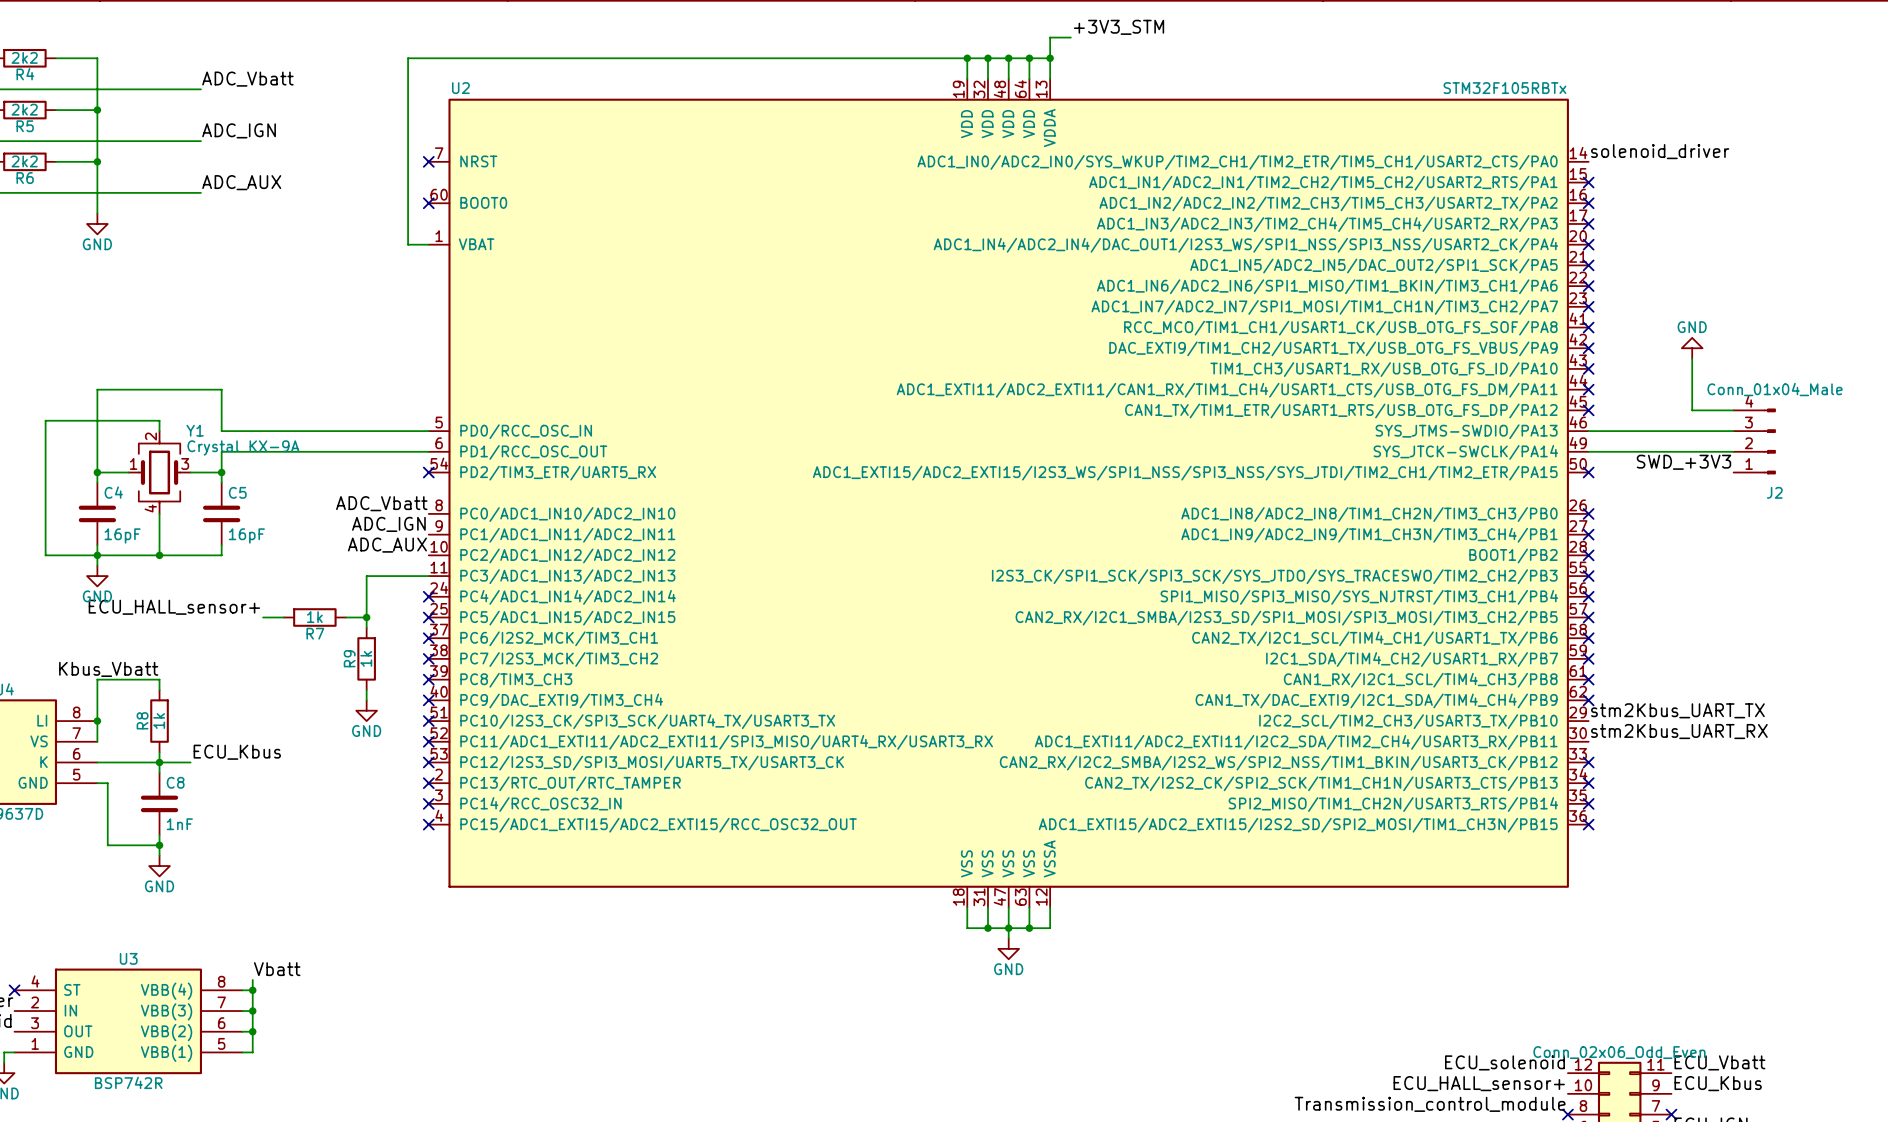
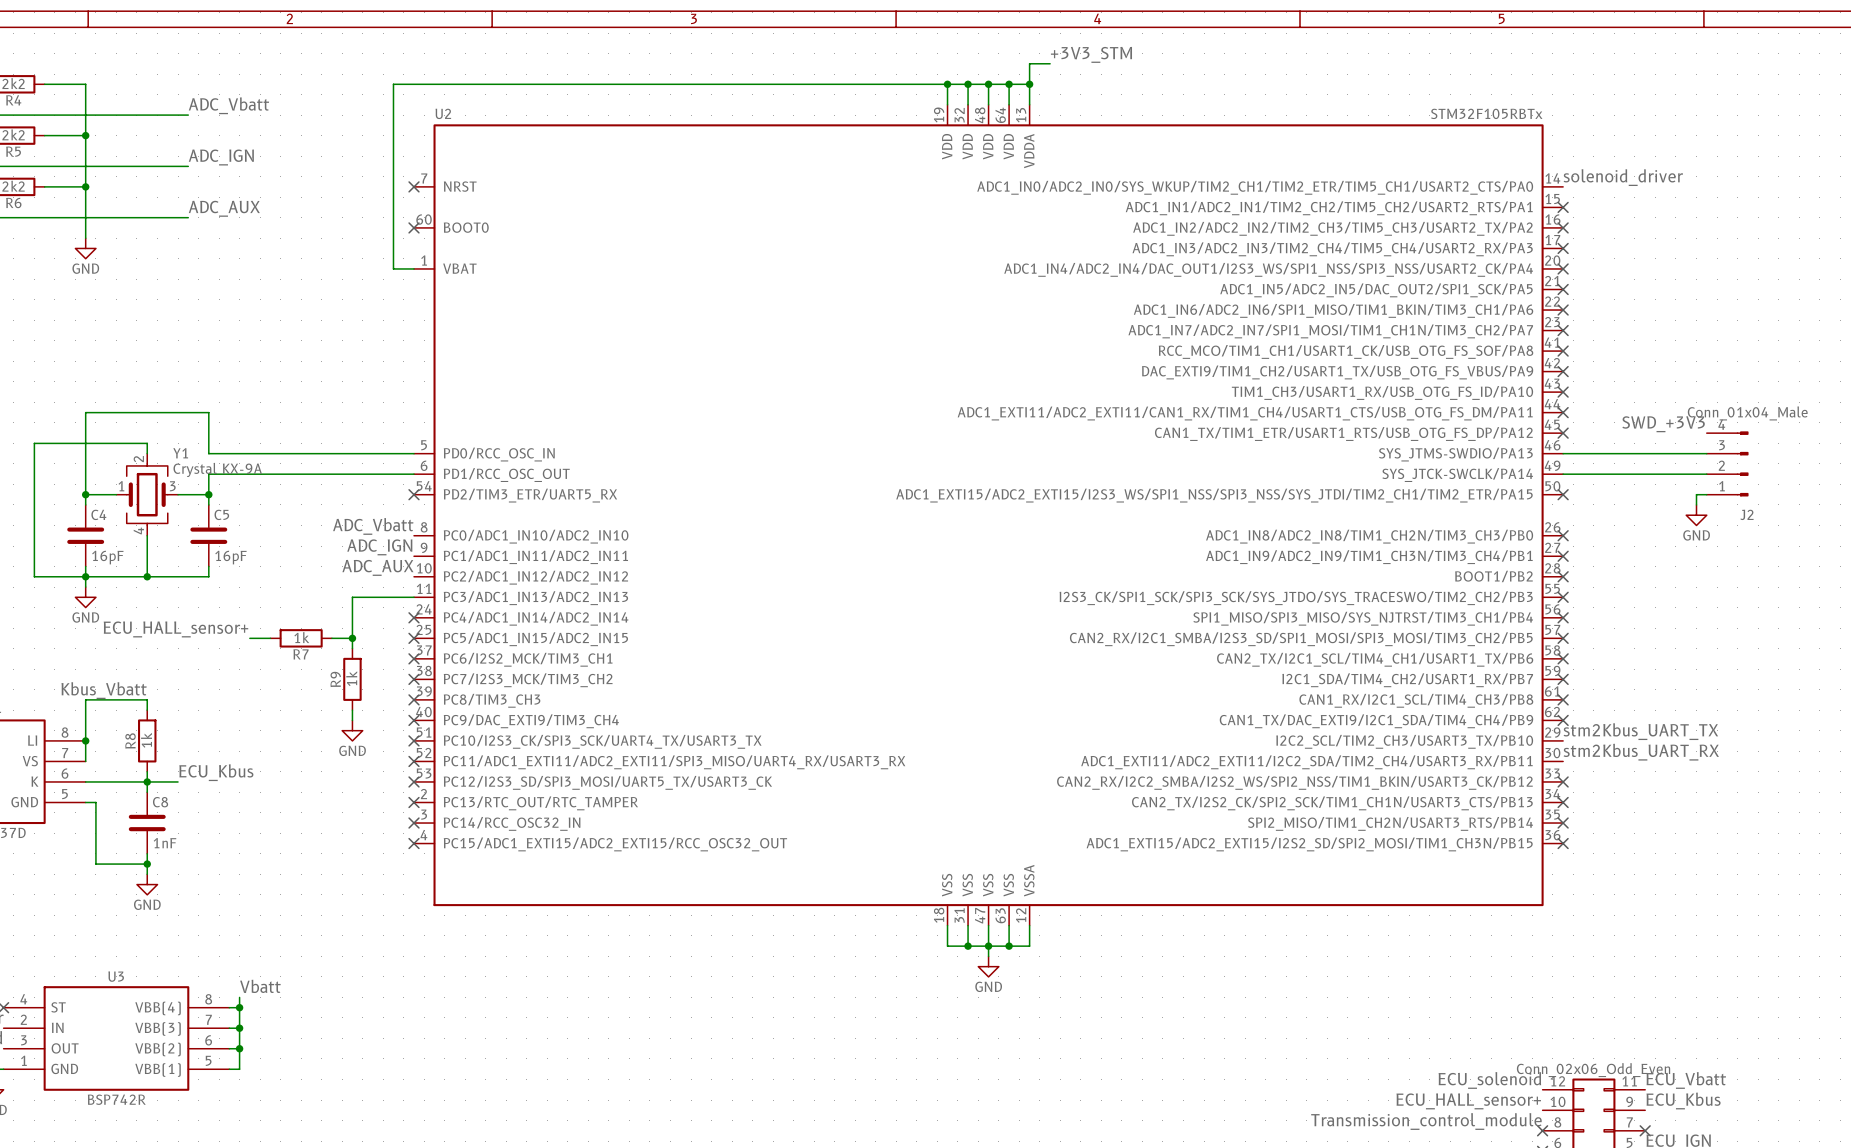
power symbol rotation: 0° (1692, 348) -> 180° (1696, 515)
power symbol position: GND (1692, 348) -> GND (1696, 515)
wire: (1692, 358) (1692, 410) (1733, 410) -> none
label position: SWD_+3V3 (1683, 462) -> SWD_+3V3 (1663, 424)
wire: none -> (1706, 494) (1696, 494) (1696, 504)

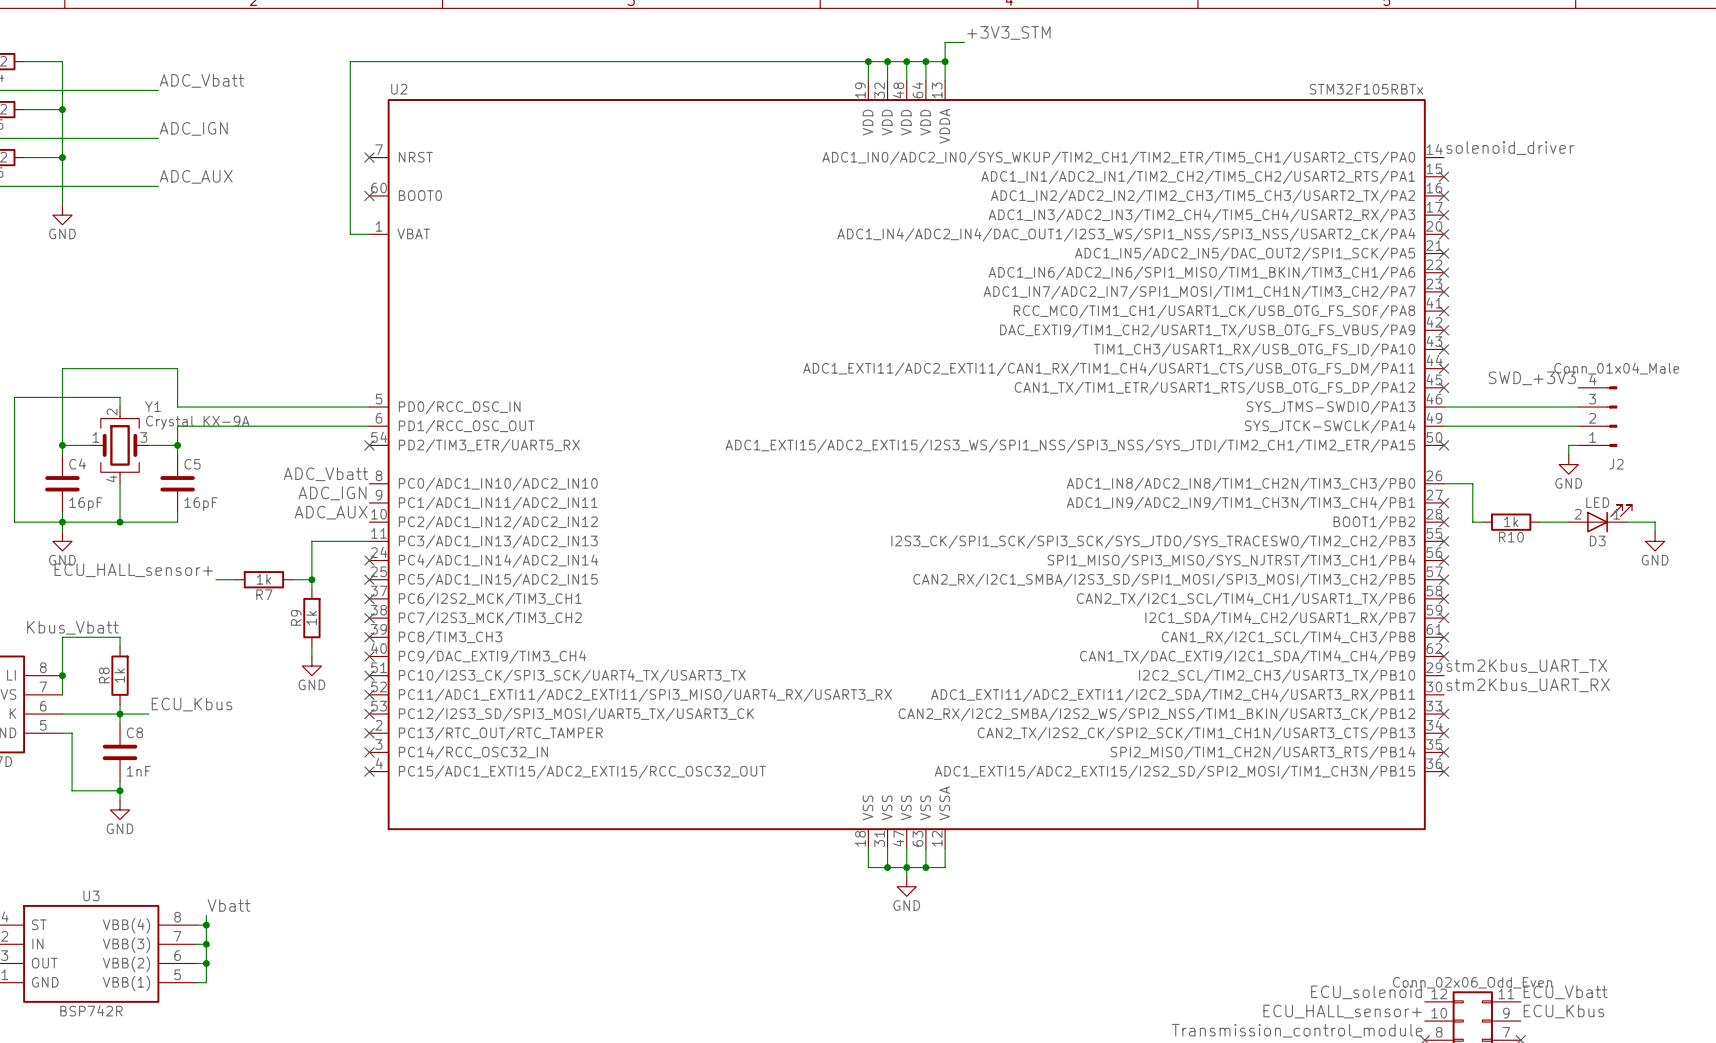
wire: none -> (1444, 483) (1472, 483) (1472, 522) (1482, 522)
no-connect mark: (1563, 535) -> none
D3: none -> LED (1600, 518)
R10: none -> 1k (1511, 522)
wire: none -> (1539, 522) (1568, 522)
wire: none -> (1626, 522) (1655, 522) (1655, 531)
power symbol: none -> GND (1655, 541)

